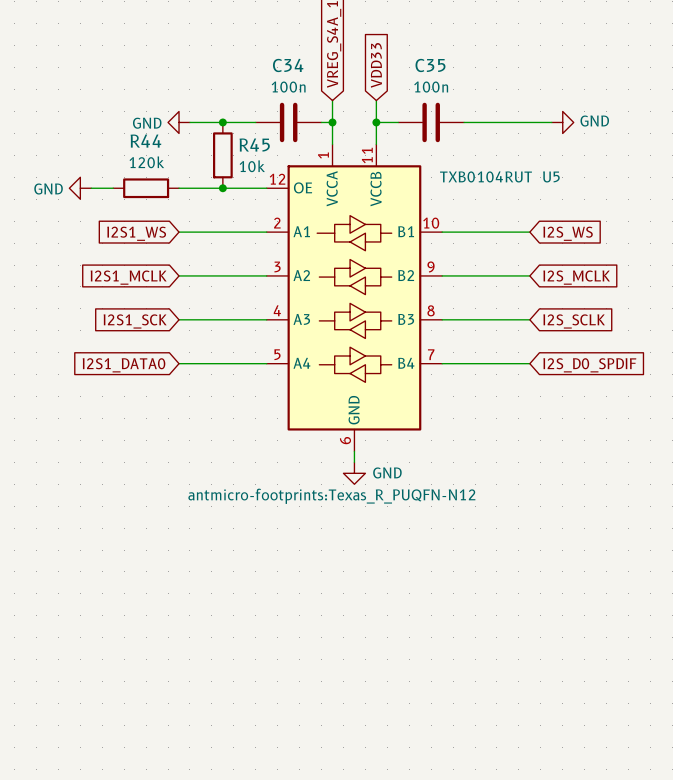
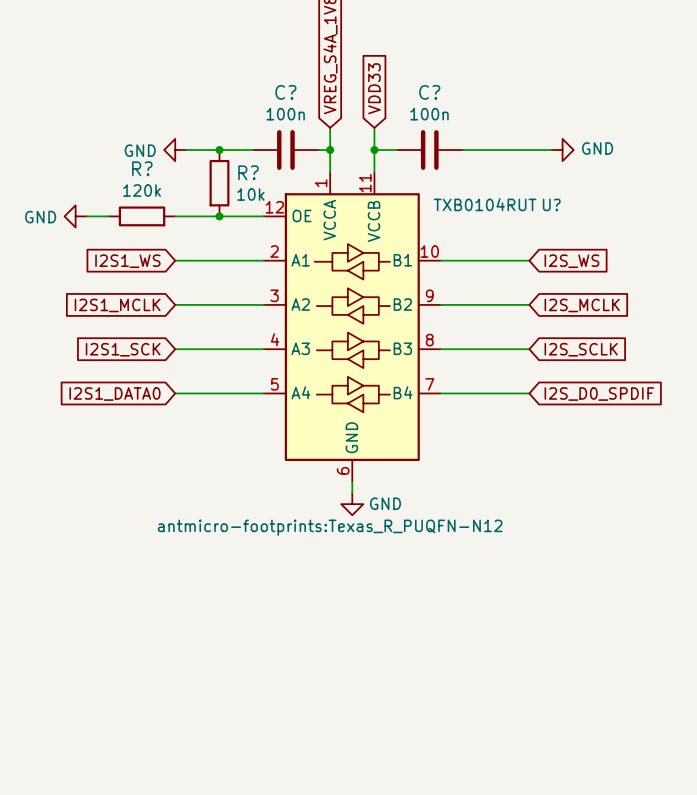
C34 name: C34 (288, 65) -> C? (285, 92)
C35 name: C35 (430, 65) -> C? (429, 92)
R44 name: R44 (145, 141) -> R? (142, 168)
R45 name: R45 (254, 145) -> R? (248, 172)
U5 name: U5 (551, 176) -> U? (551, 204)

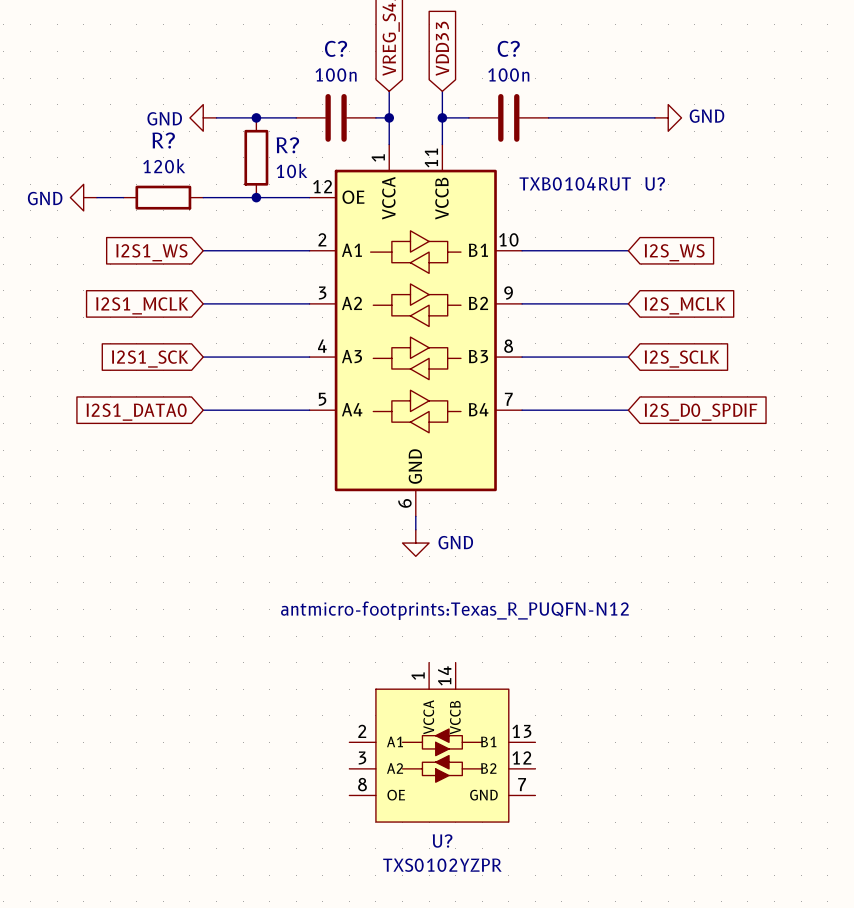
U? text position: antmicro-footprints:Texas_R_PUQFN-N12 (330, 527) -> antmicro-footprints:Texas_R_PUQFN-N12 (454, 610)
U?: none -> TXS0102YZPR (442, 742)

